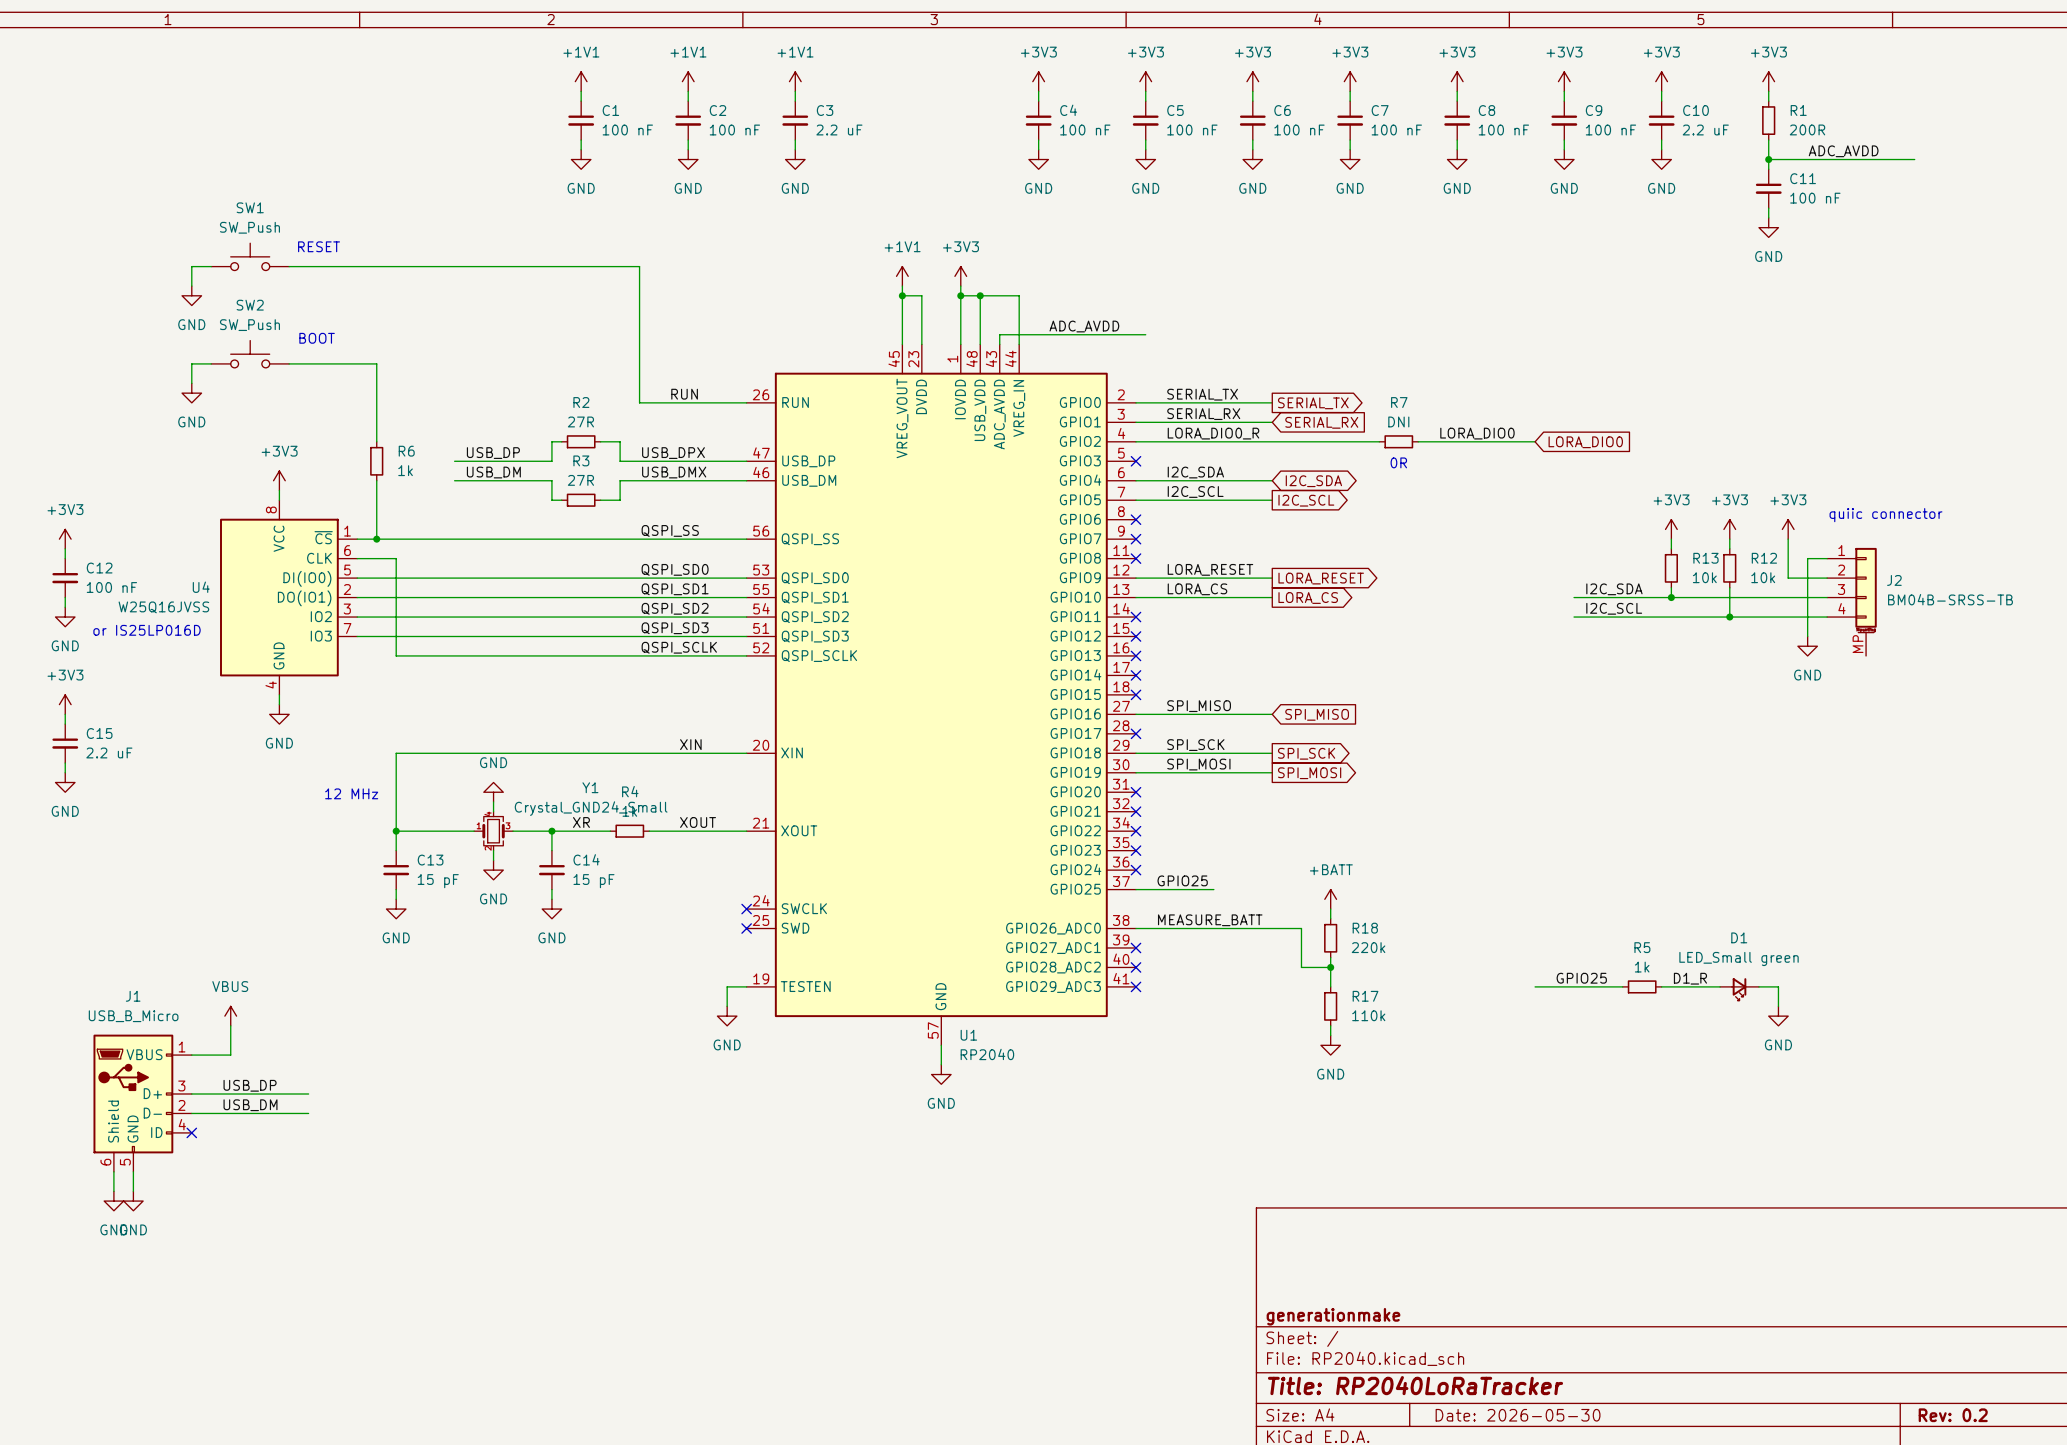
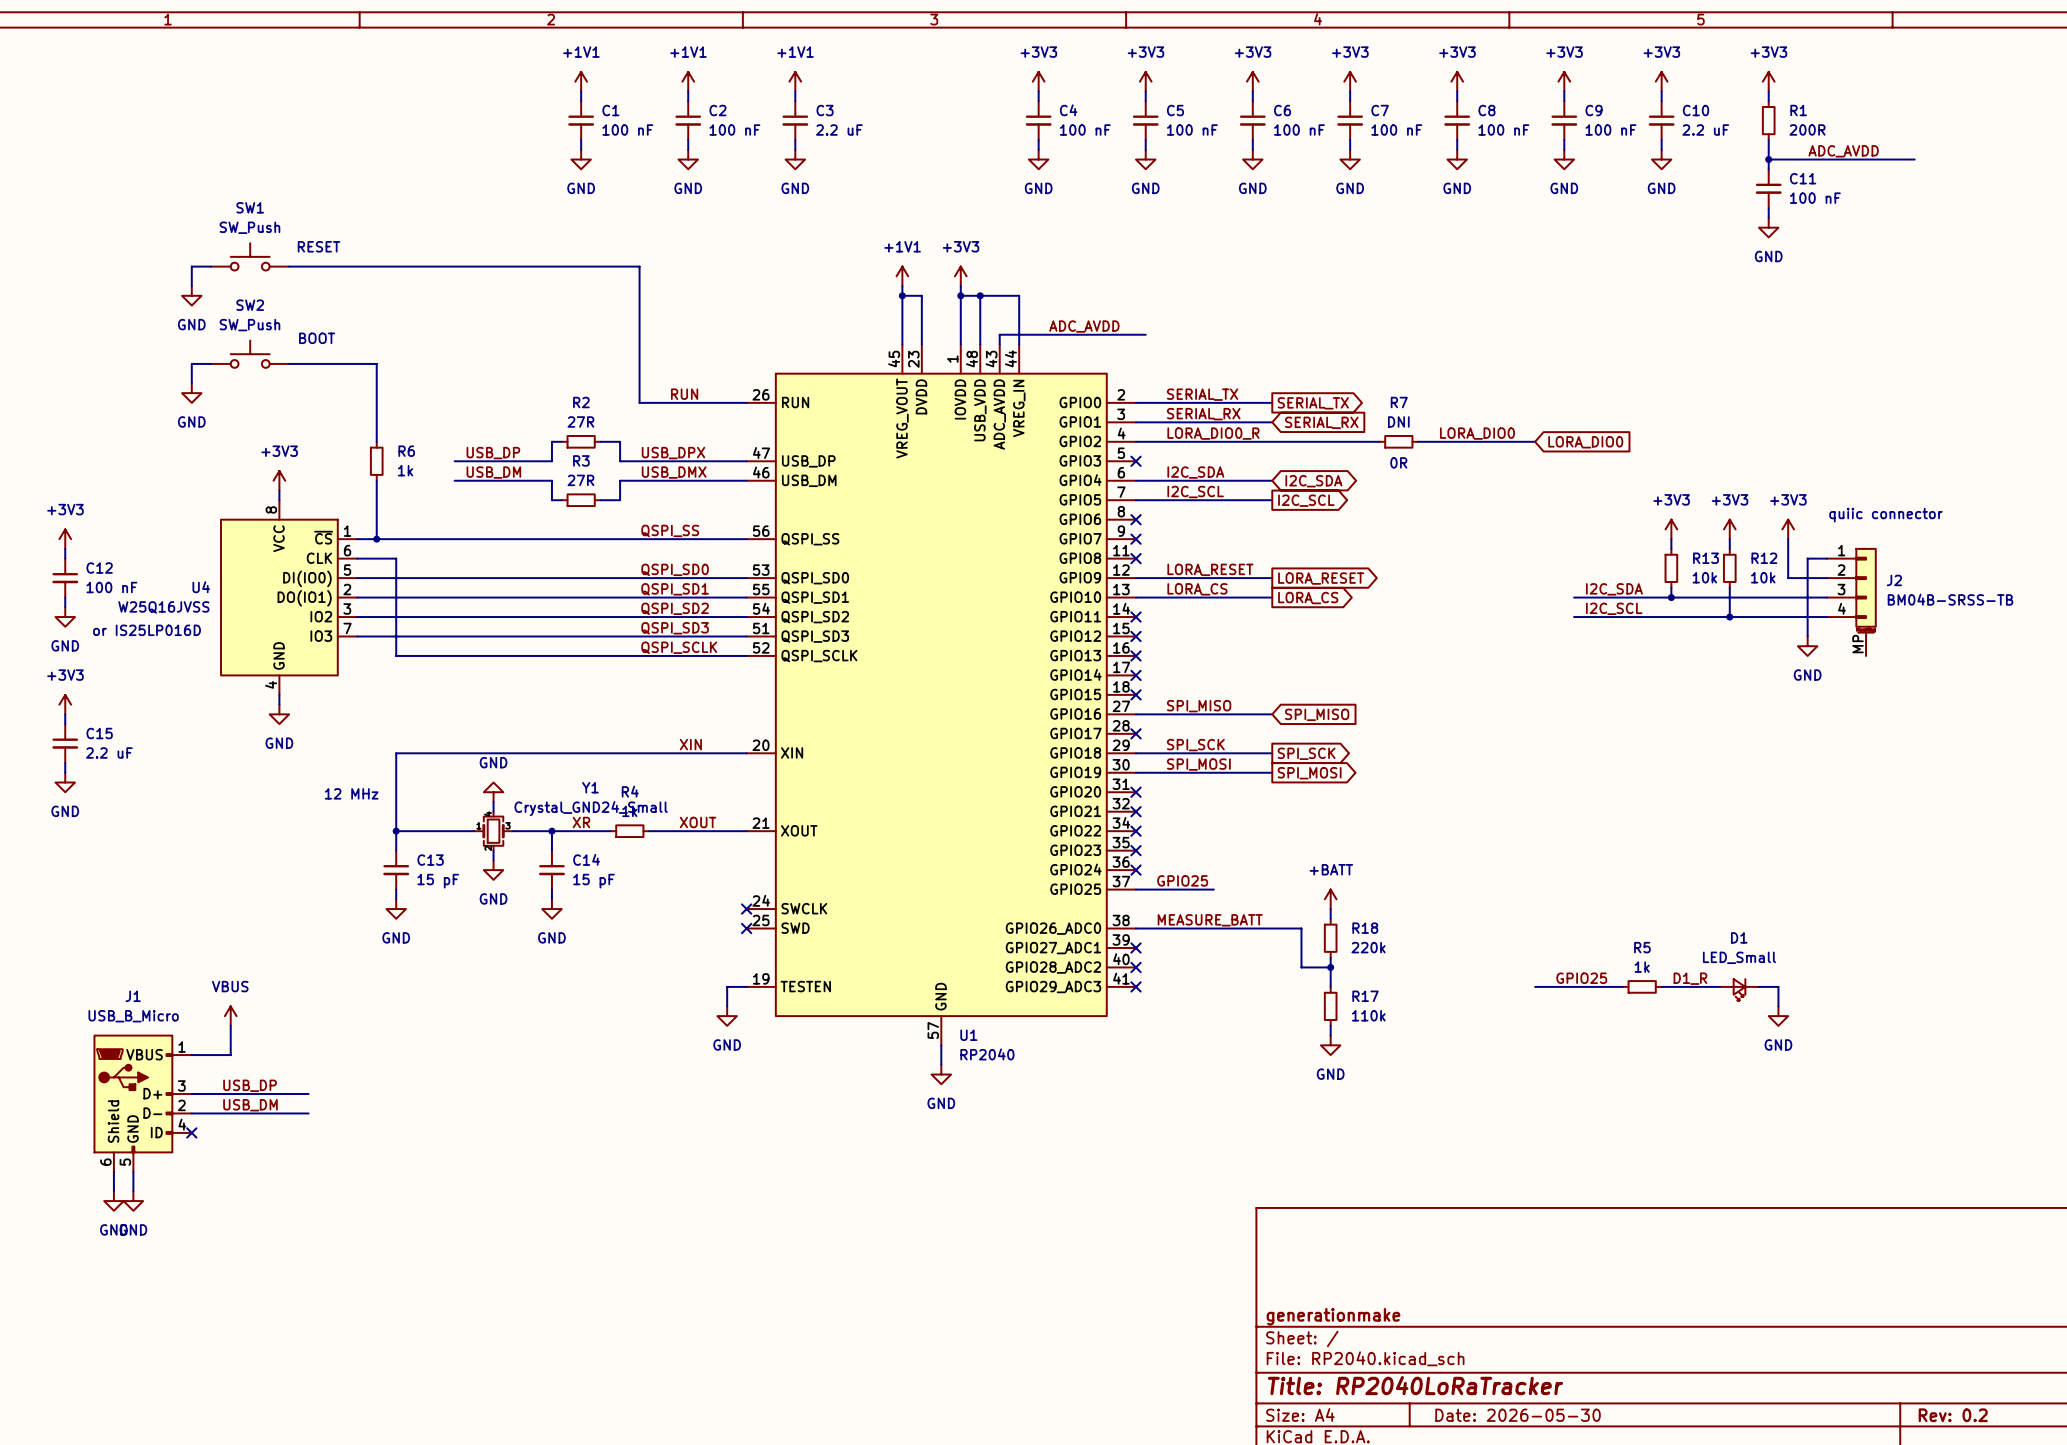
D1 value: LED_Small green (1739, 958) -> LED_Small (1739, 957)

